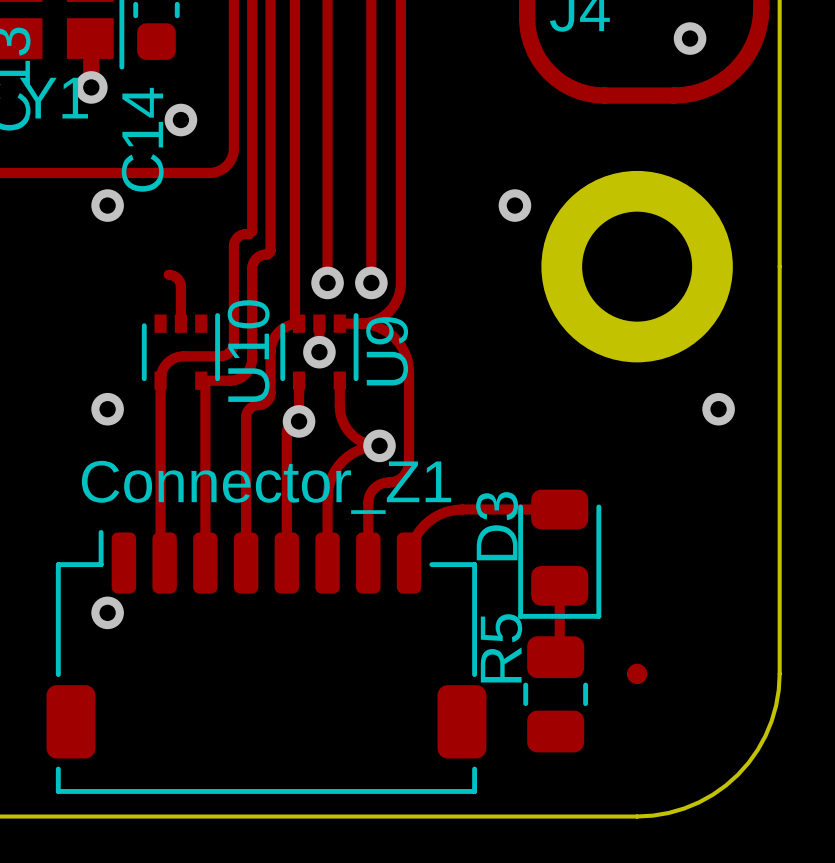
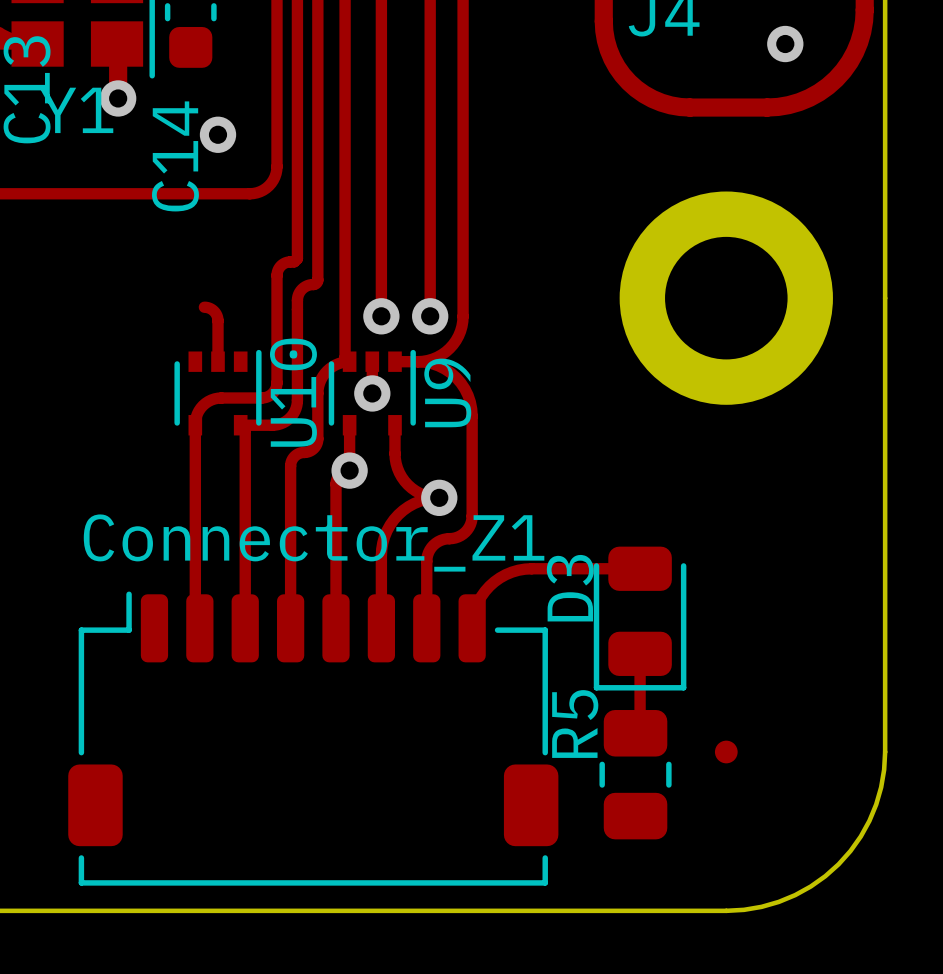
via: (107, 205) -> none
via: (514, 205) -> none
via: (107, 409) -> none
via: (718, 409) -> none
via: (107, 612) -> none

